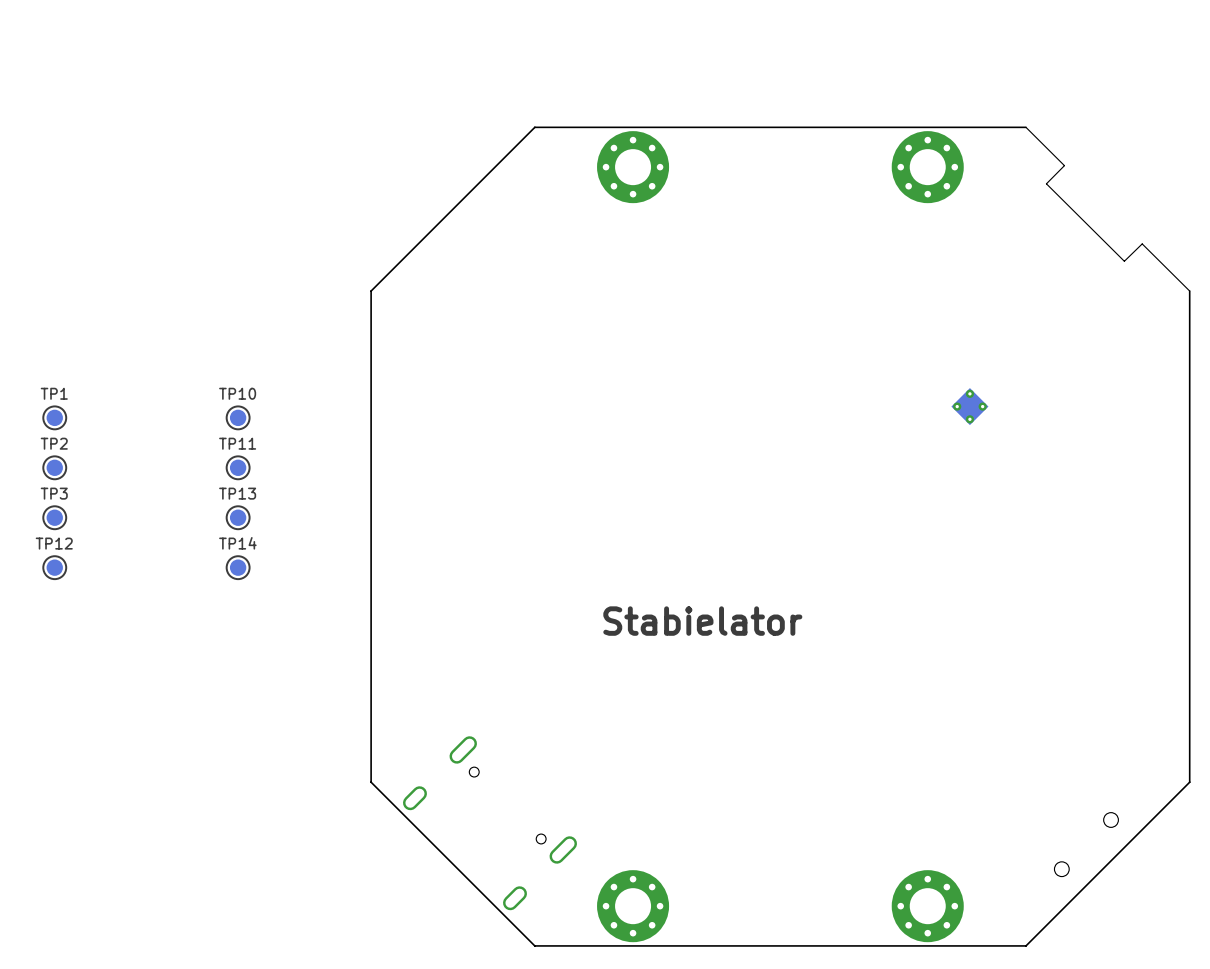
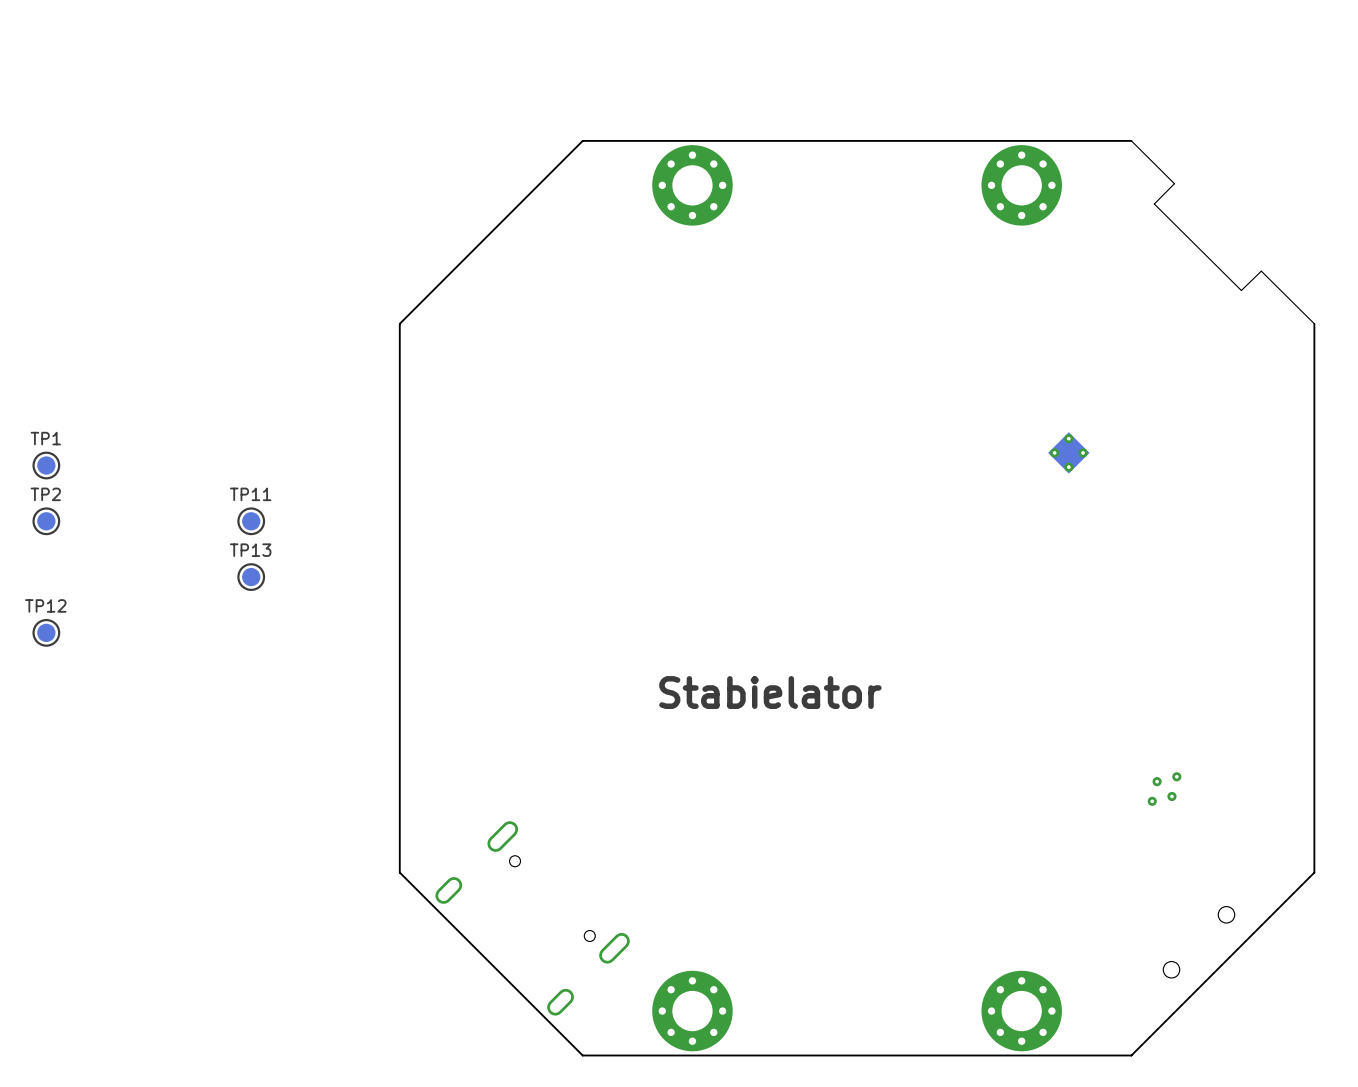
TP10: (238, 417) -> none
TP3: (54, 517) -> none
TP14: (238, 567) -> none
part: none -> (1164, 789)

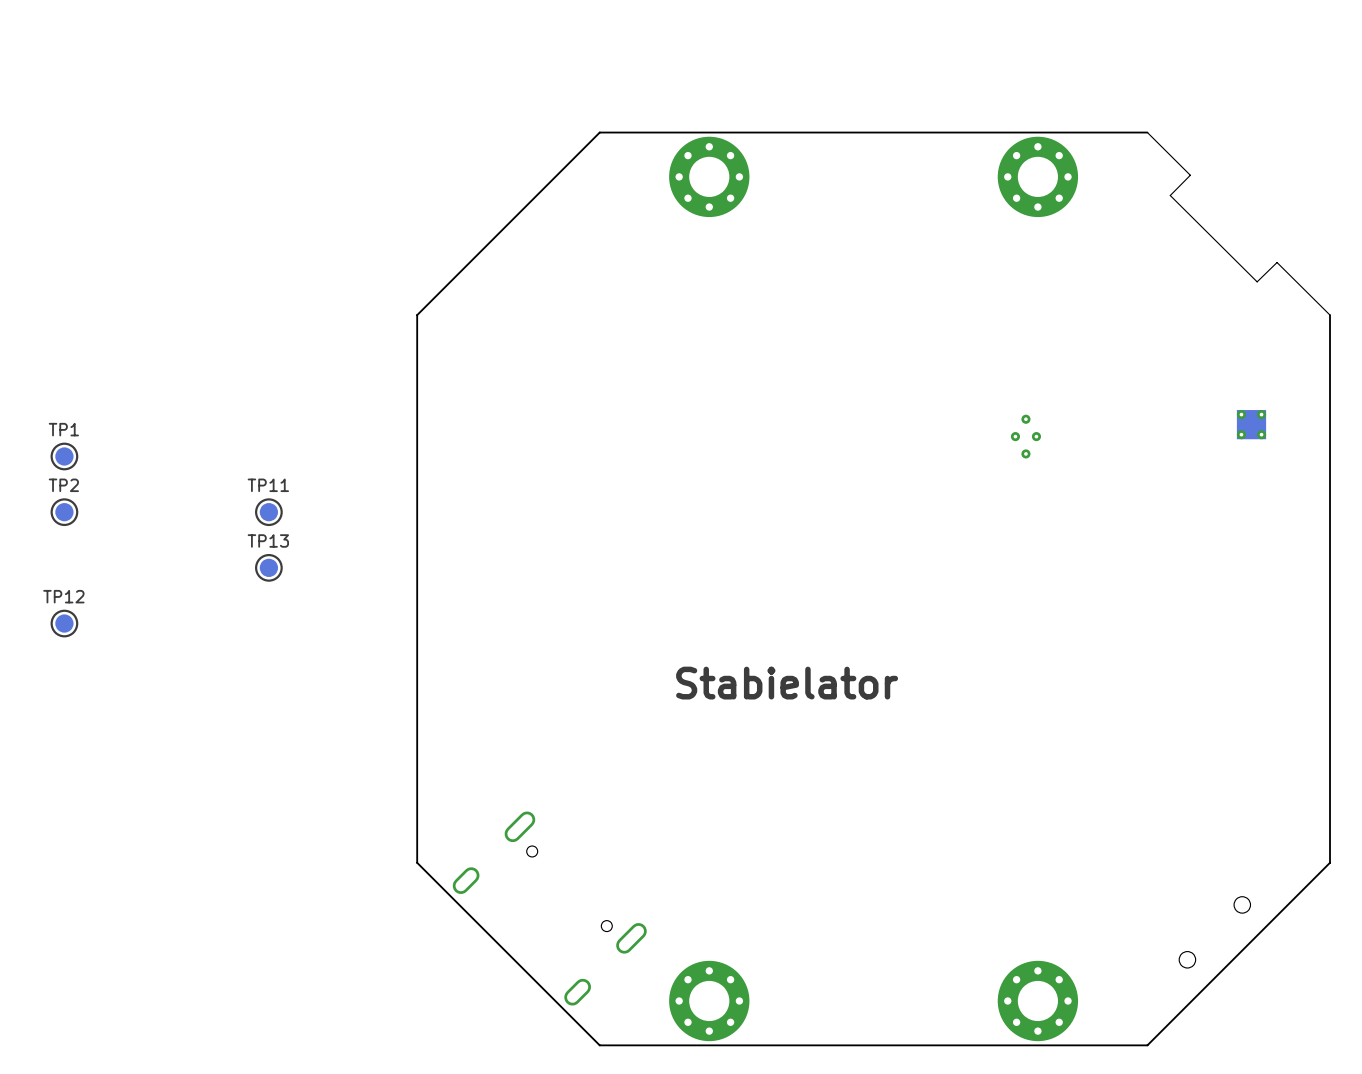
part: none -> (1251, 424)
part: none -> (1025, 436)
part: (1068, 452) -> none
part: (1164, 789) -> none

